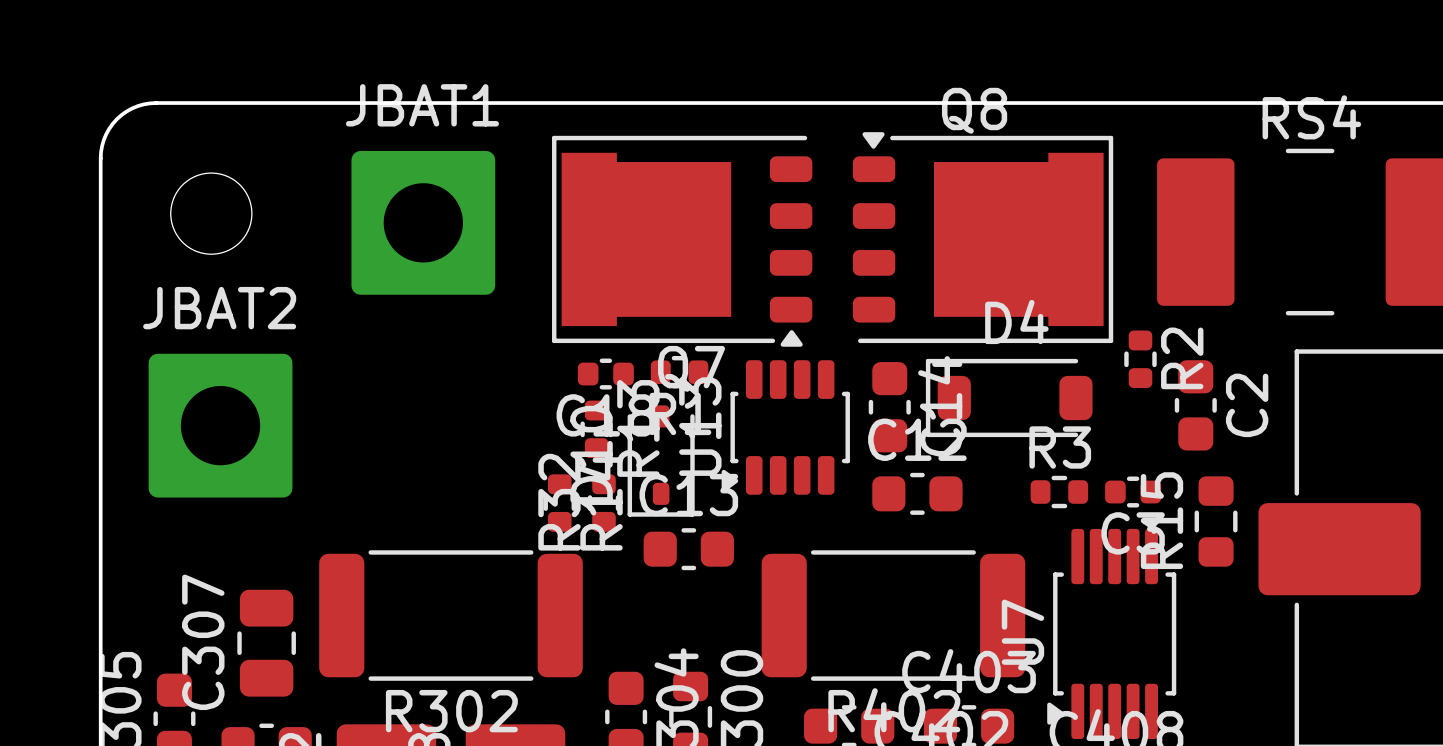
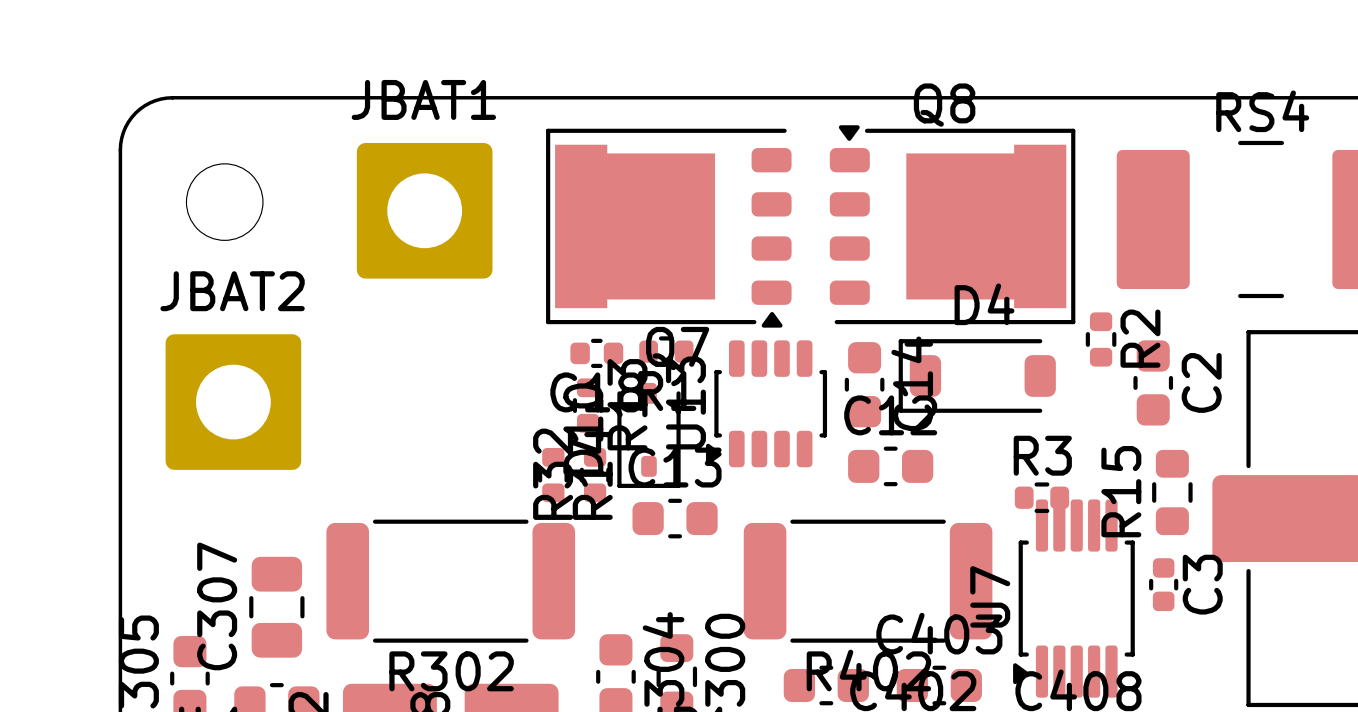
R3 position: (1059, 492) -> (1041, 497)
C3 rotation: 0° (1133, 492) -> 90° clockwise (1163, 584)
C3 position: (1133, 492) -> (1163, 584)

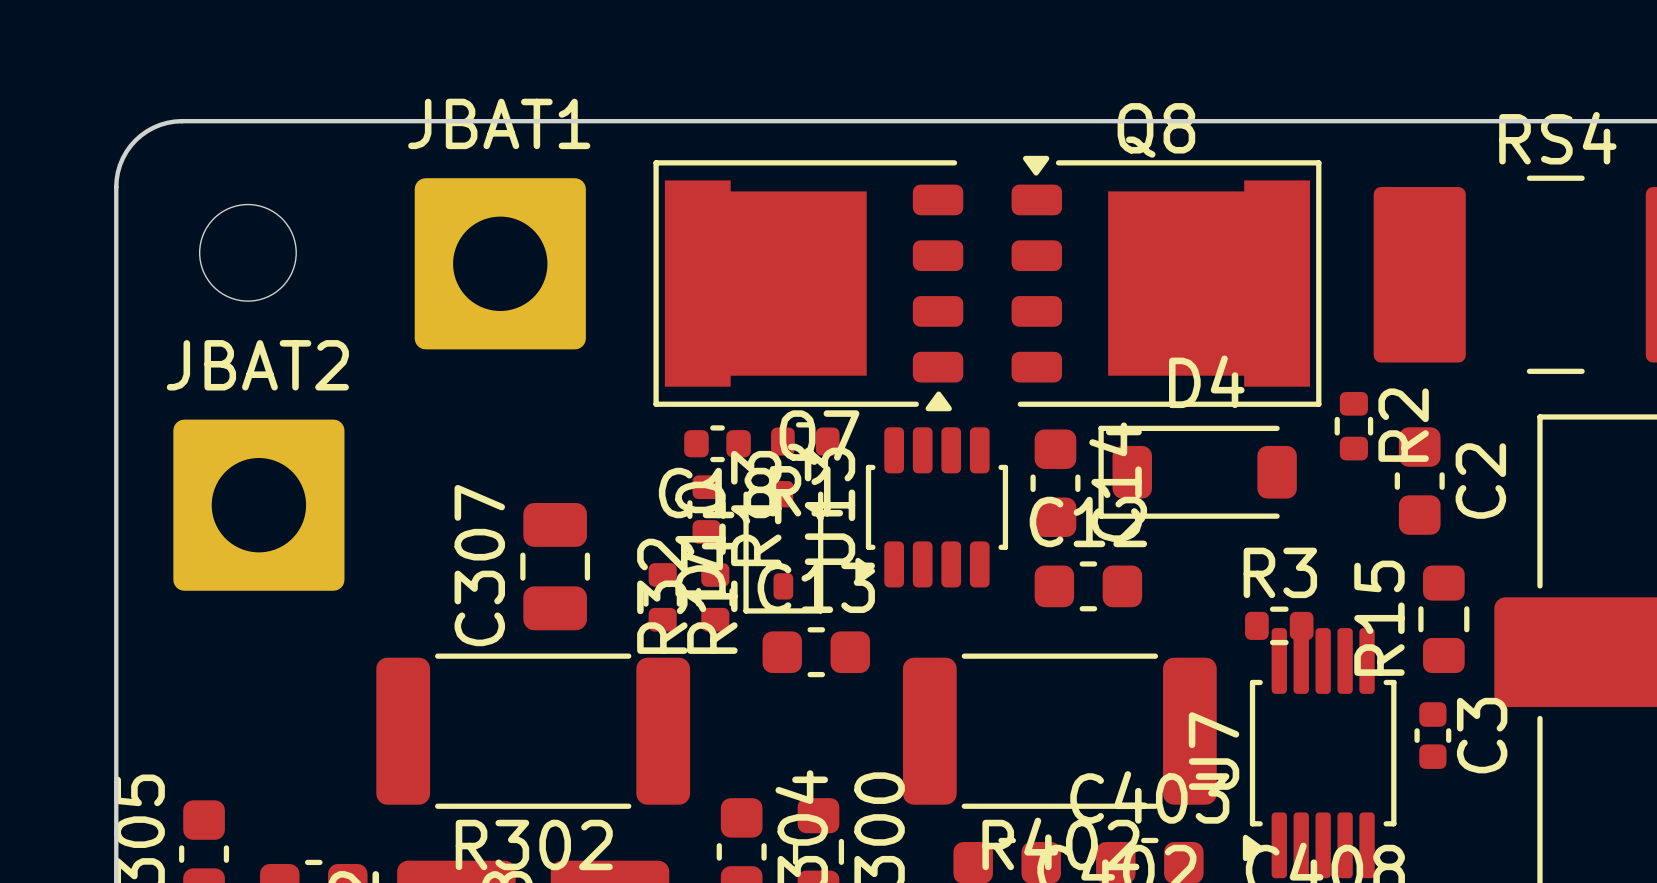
C307 position: (276, 607) -> (555, 566)

